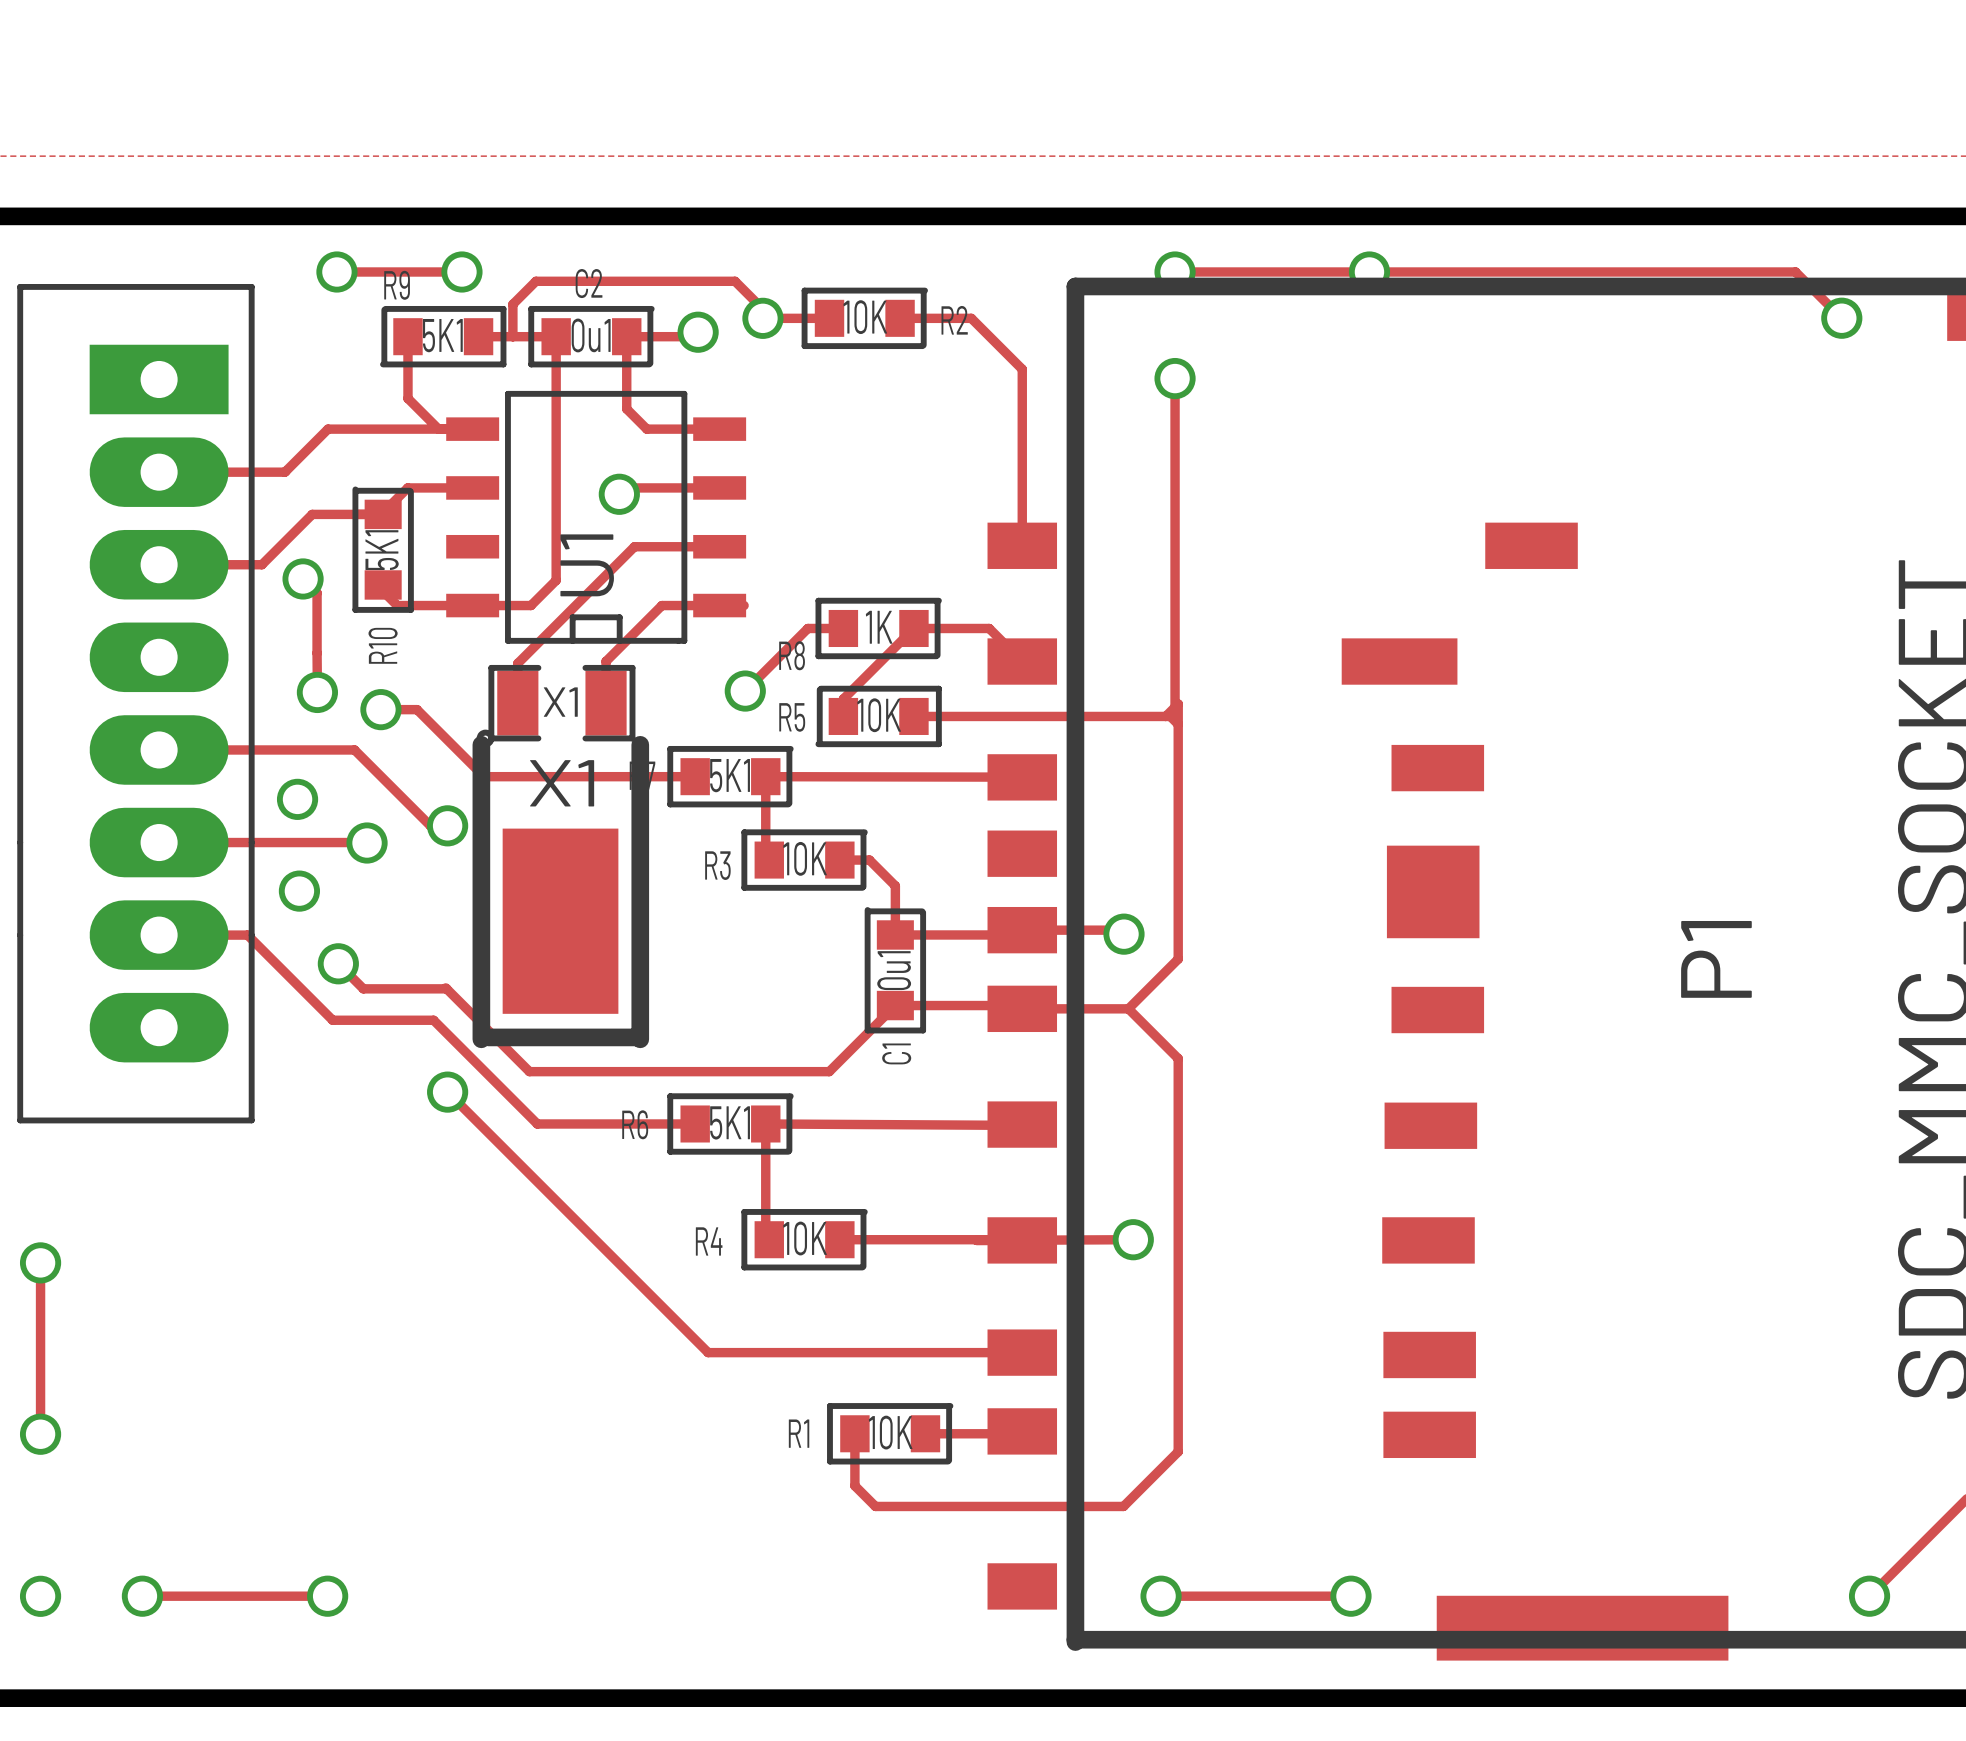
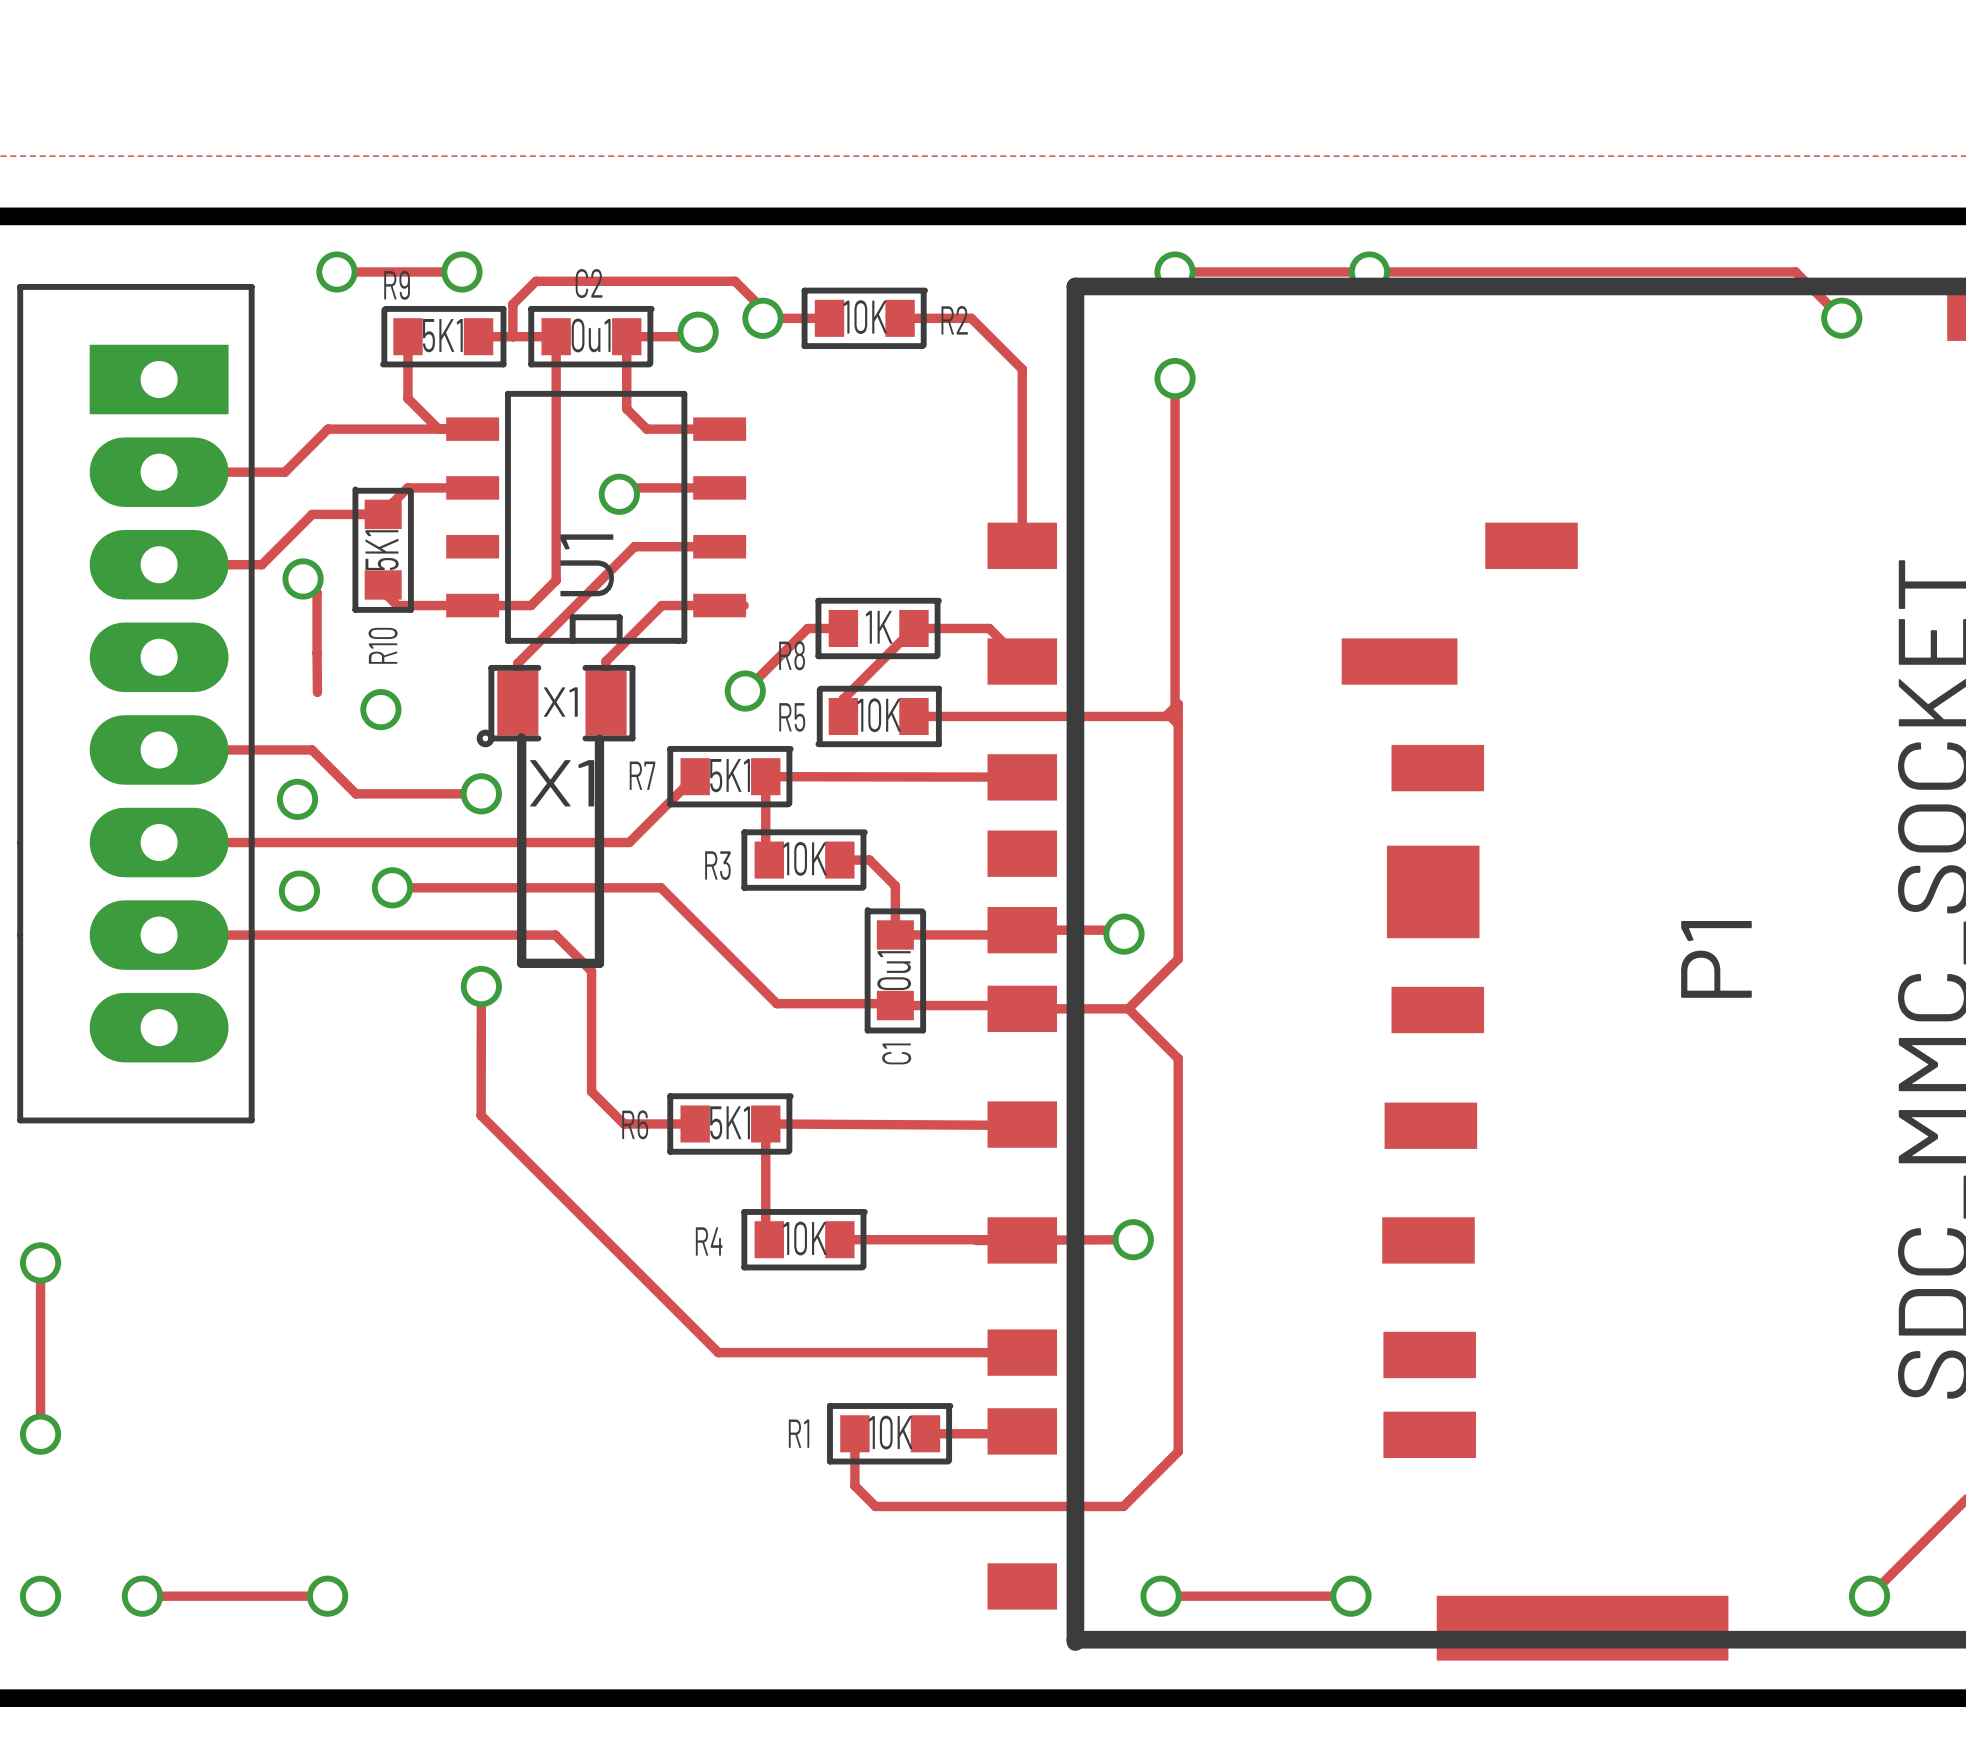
via: (317, 692) -> none
track: (380, 709) (417, 709) (484, 776) (695, 776) -> (366, 842) (629, 842) (695, 776)
line: none -> (521, 737) (521, 963) (599, 963) (599, 739)
line: (481, 744) (481, 1039) -> none
line: (640, 744) (640, 1039) -> none
track: (312, 749) (354, 749) (430, 825) (447, 825) -> (312, 749) (355, 793) (481, 793)
via: none -> (481, 793)
via: (447, 825) -> none
via: (367, 843) -> none
track: none -> (392, 887) (660, 887) (776, 1003) (893, 1003)
via: none -> (392, 887)
part: (560, 921) -> none
track: (247, 935) (332, 1020) (433, 1020) (537, 1123) (623, 1123) -> (247, 935) (555, 935) (591, 971) (591, 1091) (623, 1123)
track: (338, 963) (363, 988) (446, 988) -> none
via: (338, 963) -> none
via: none -> (481, 986)
track: (445, 987) (529, 1071) (829, 1071) (895, 1005) -> none
line: (488, 1037) (636, 1037) -> none
track: (447, 1092) (708, 1352) (718, 1352) -> (481, 986) (481, 1115) (718, 1352)
via: (447, 1092) -> none

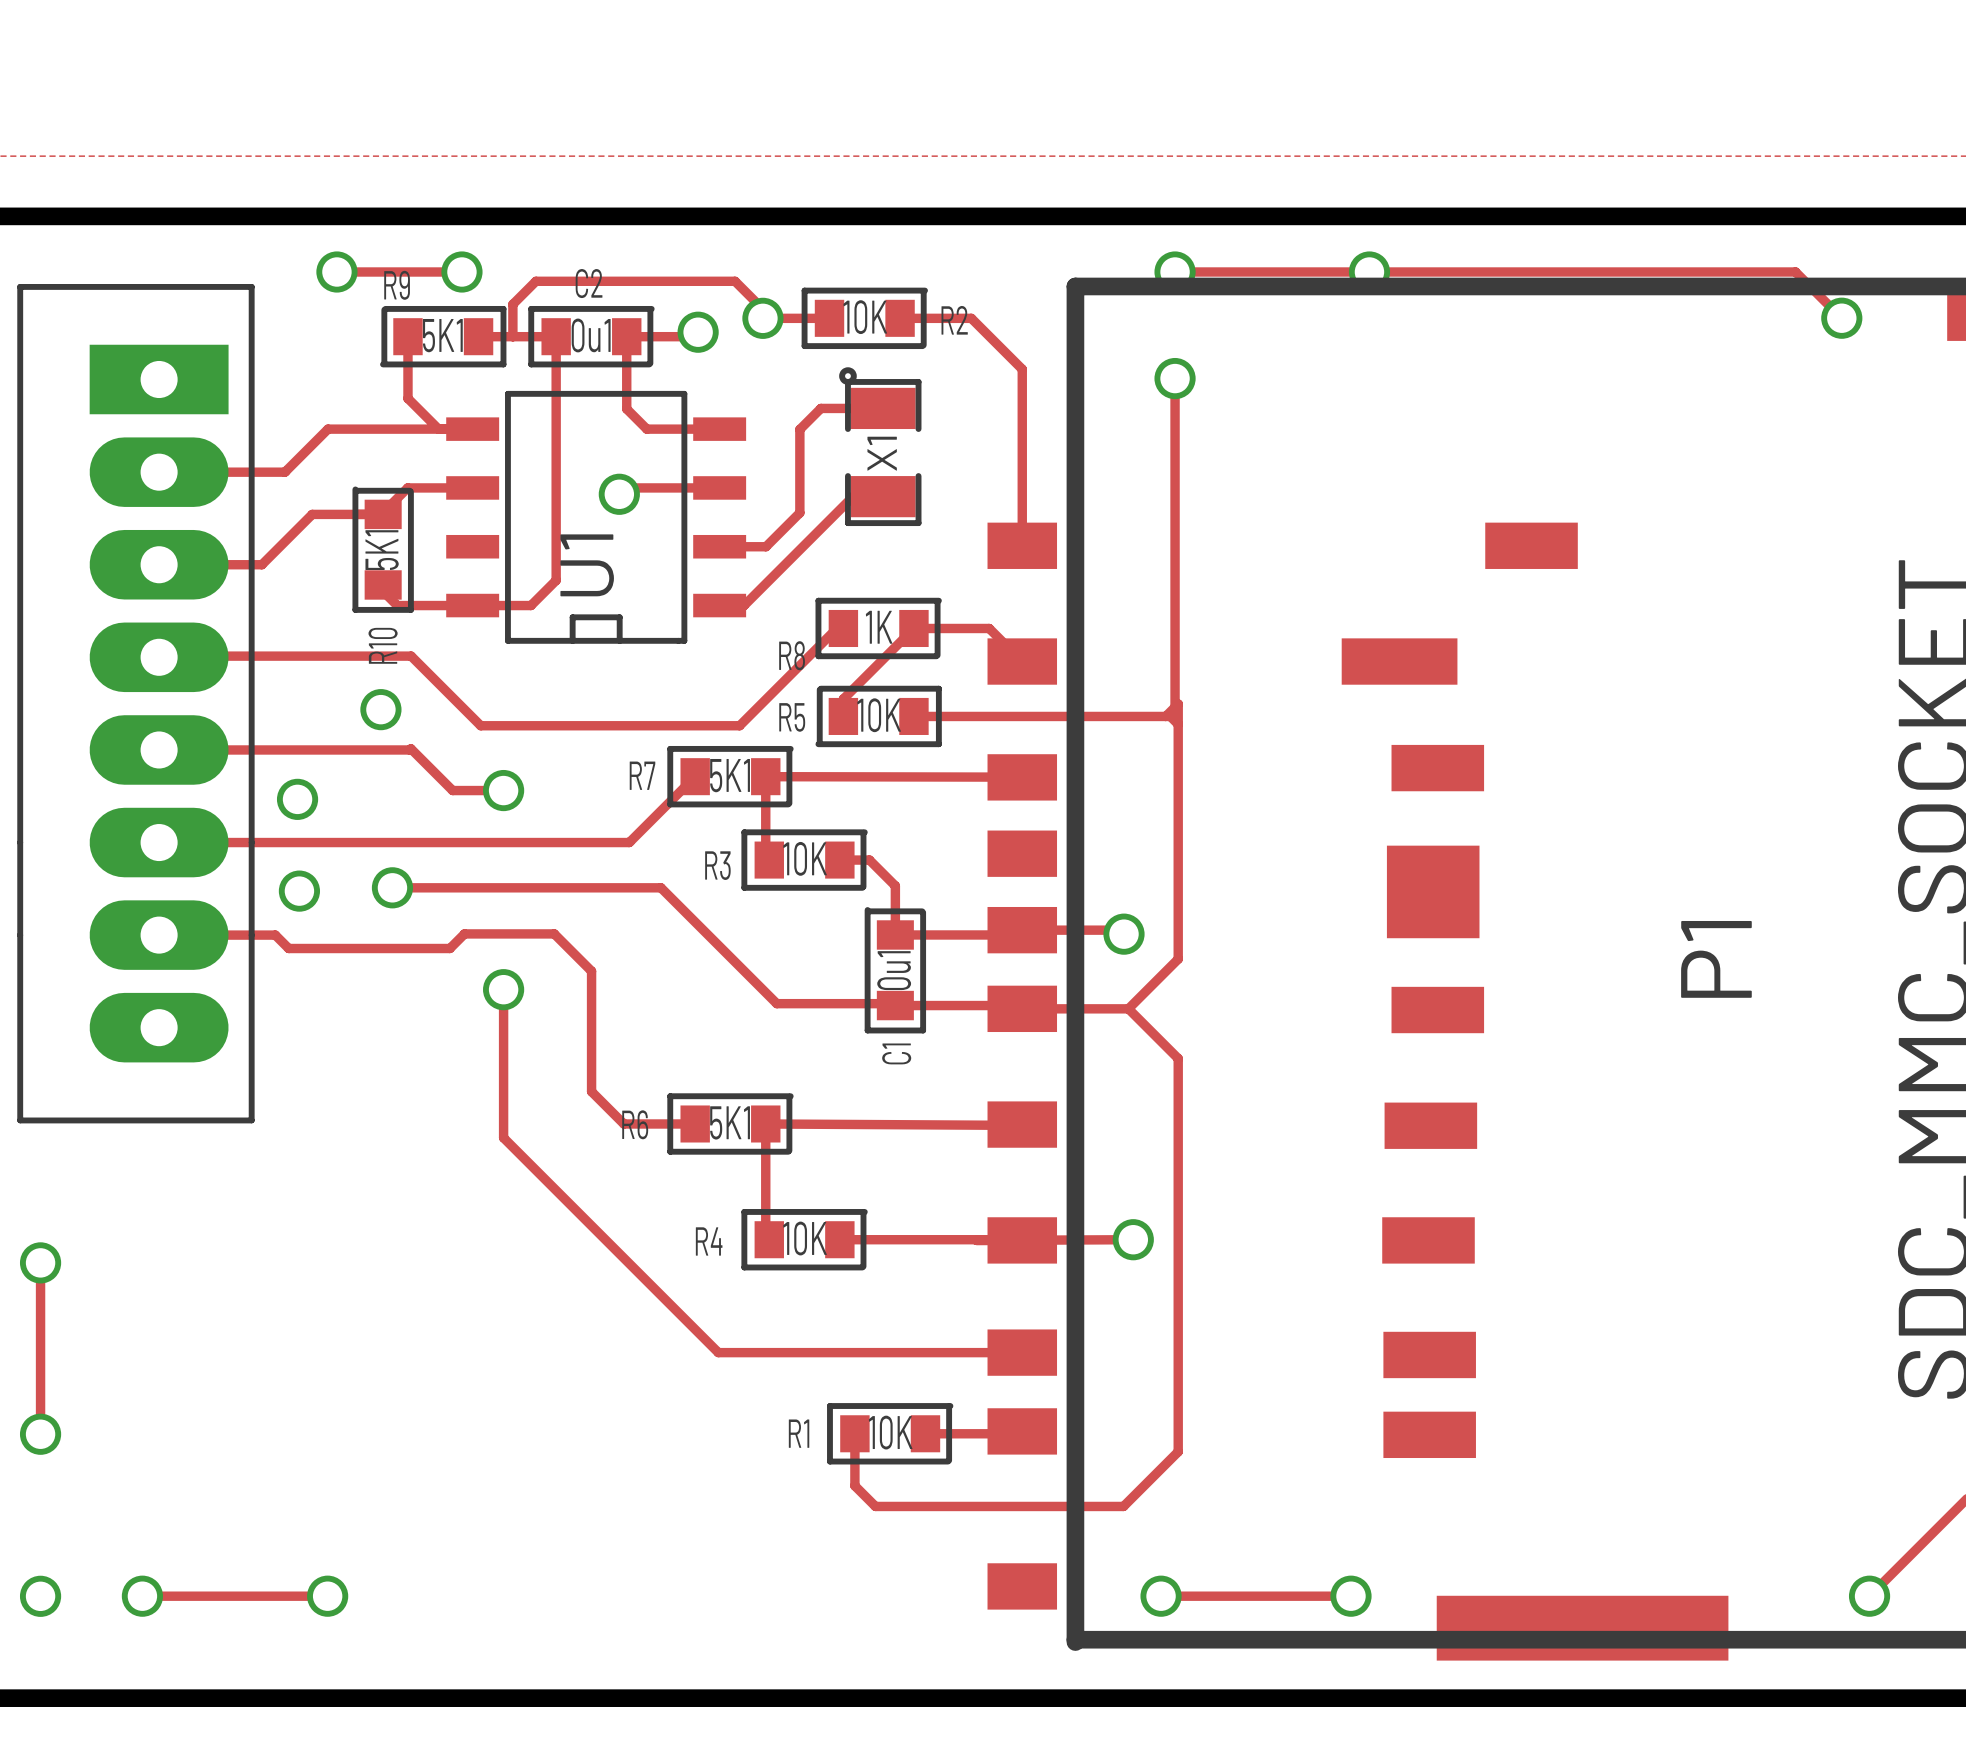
track: none -> (883, 496) (853, 496) (744, 605)
track: (719, 546) (634, 546) (517, 663) (517, 703) -> (719, 546) (765, 546) (799, 512) (799, 429) (820, 408) (883, 408)
track: (303, 578) (317, 592) (317, 692) -> none
via: (303, 578) -> none
track: (719, 605) (661, 605) (606, 661) (606, 703) -> none
track: (836, 628) (807, 628) (745, 691) -> (836, 628) (739, 725) (480, 725) (411, 656) (159, 657)
via: (745, 691) -> none
X1 rotation: 0° (556, 706) -> 90° clockwise (880, 446)
X1 position: (556, 706) -> (880, 446)
line: (521, 737) (521, 963) (599, 963) (599, 739) -> none
track: (312, 749) (355, 793) (481, 793) -> (312, 749) (410, 748) (452, 790) (503, 790)
text: X1 (562, 783) -> none
via position: (481, 793) -> (503, 790)
track: (275, 935) (555, 935) -> (275, 935) (288, 948) (449, 948) (464, 933) (555, 935)
track: (481, 986) (481, 1115) (718, 1352) -> (503, 989) (503, 1137) (718, 1352)
via position: (481, 986) -> (503, 989)

